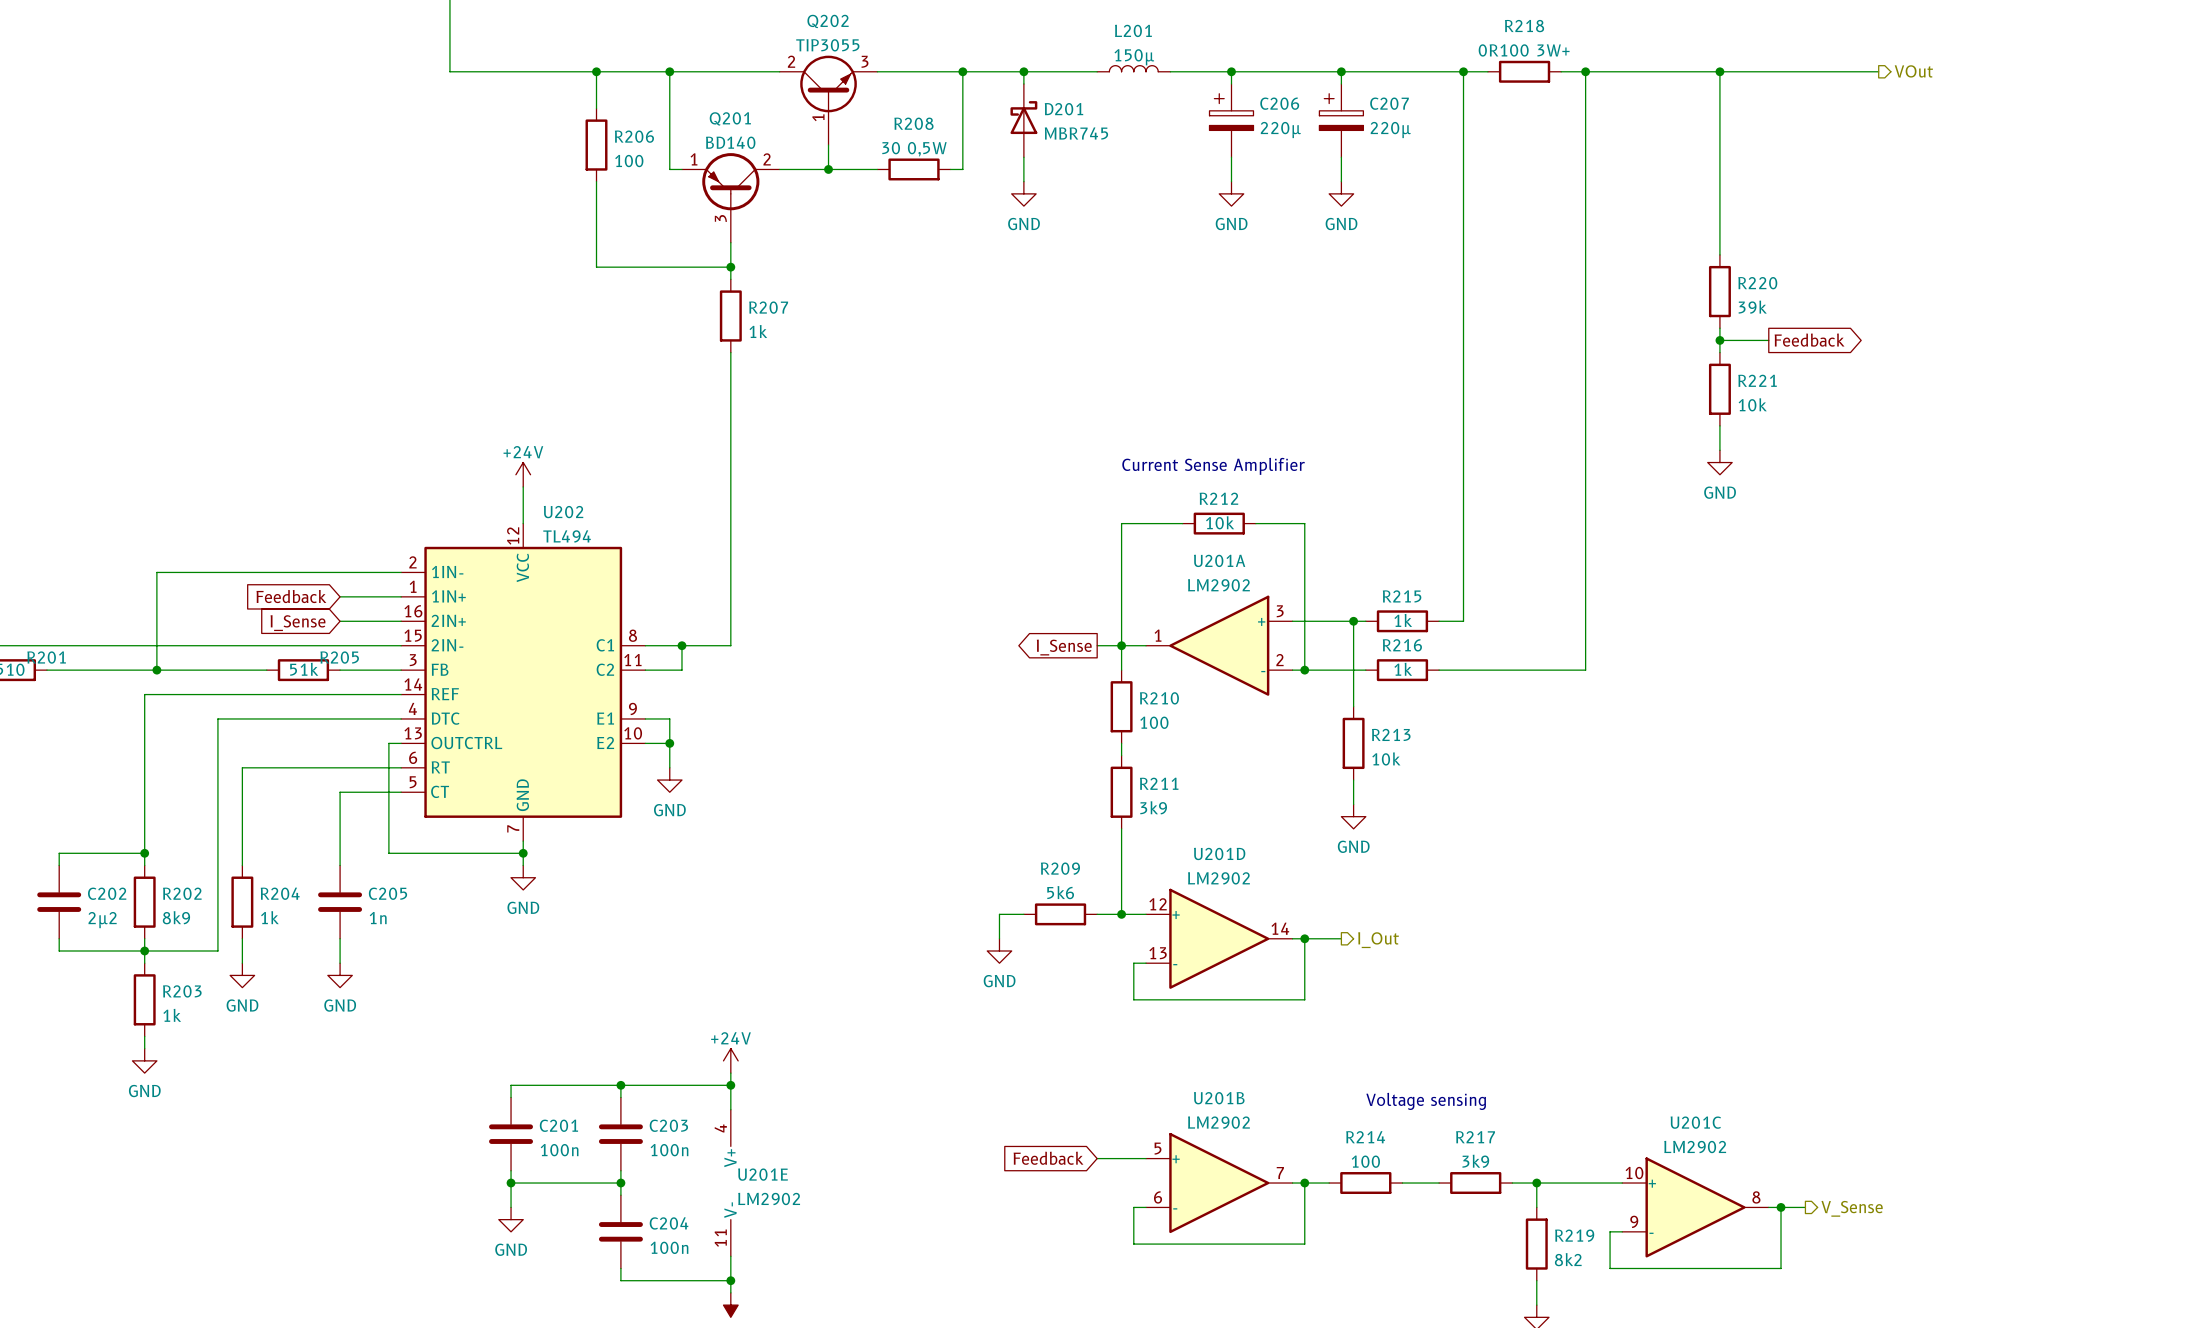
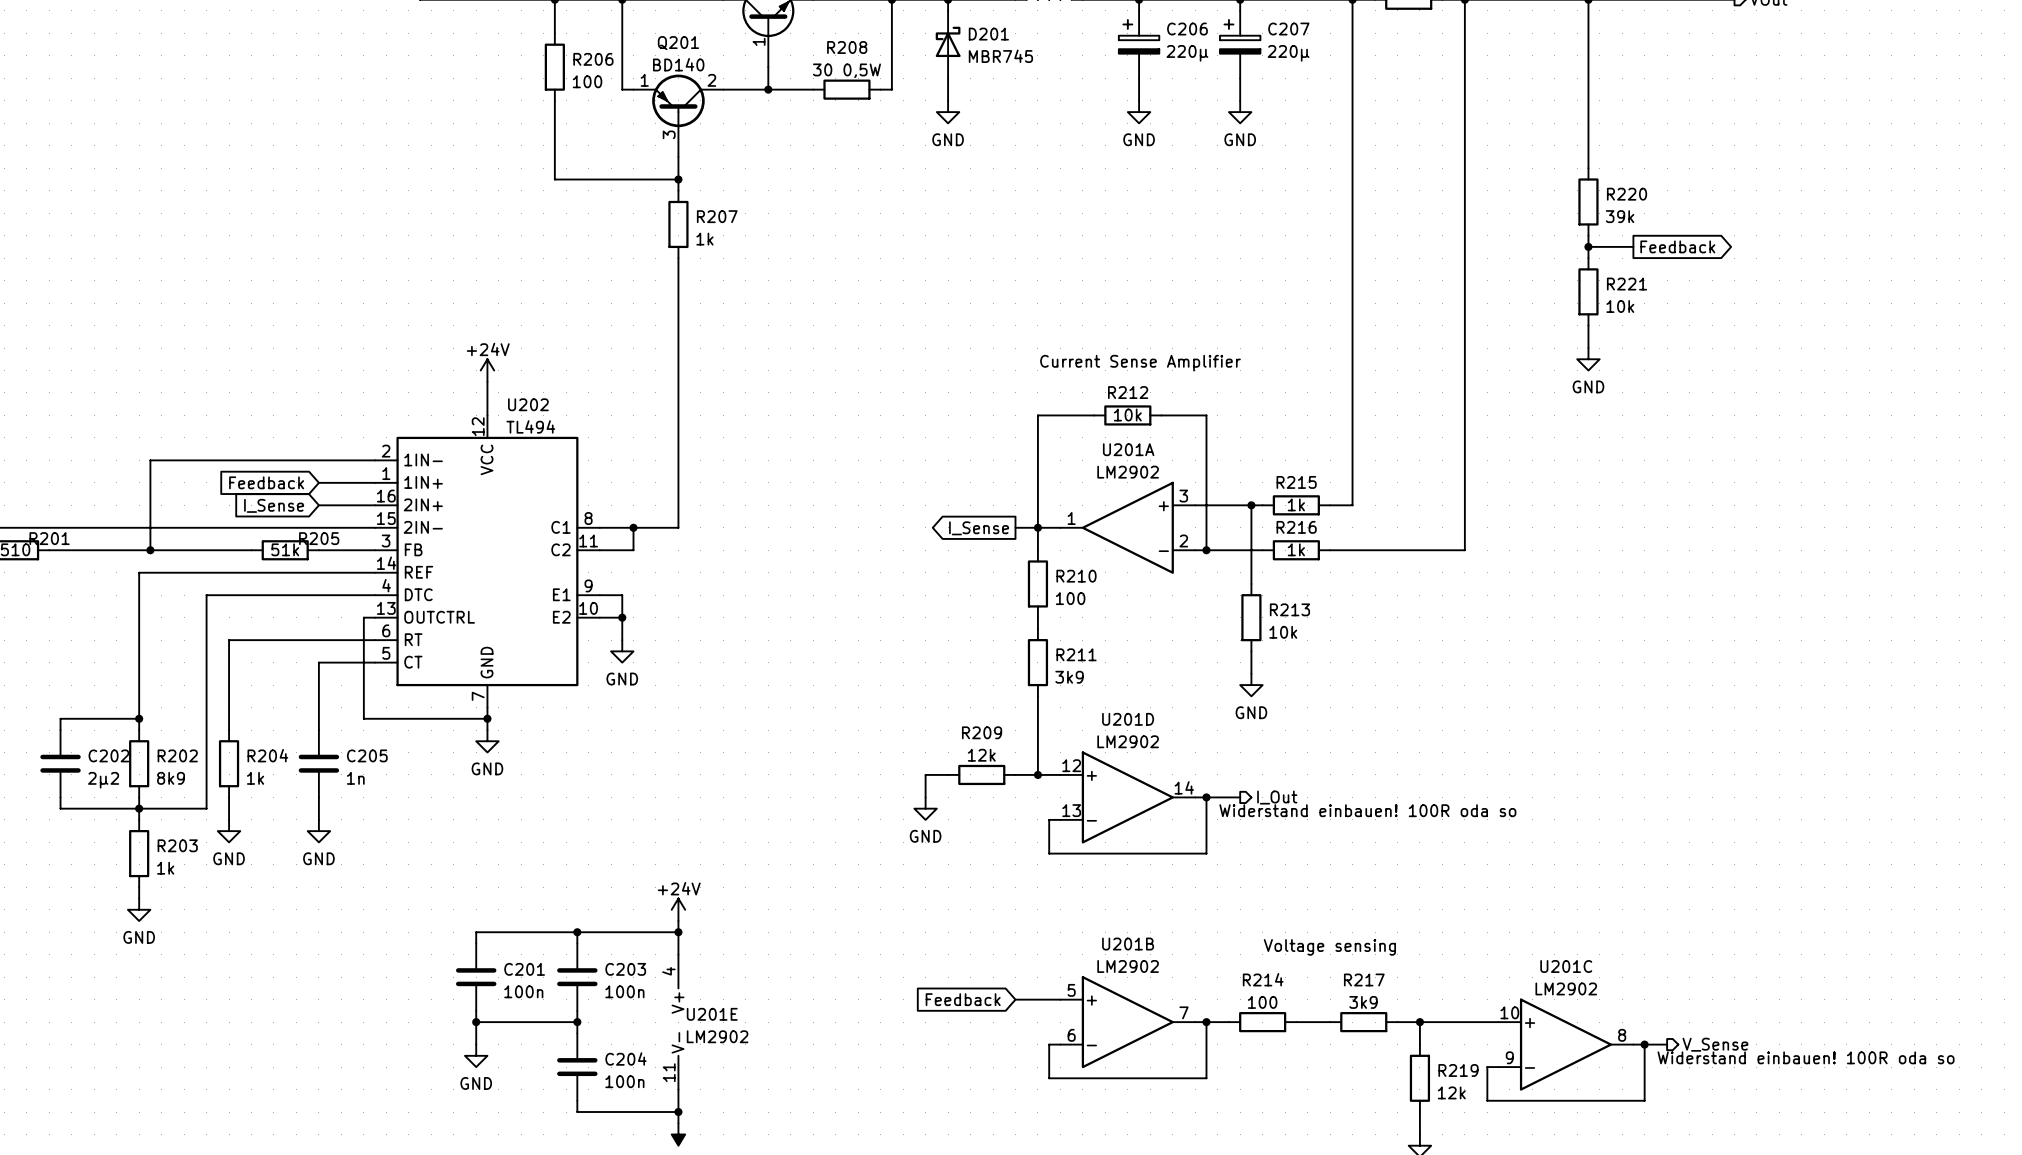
R209 value: 5k6 (1060, 892) -> 12k (981, 755)
text: none -> Widerstand einbauen! 100R oda so (1367, 810)
text: none -> Widerstand einbauen! 100R oda so (1806, 1057)
R219 value: 8k2 (1568, 1259) -> 12k (1451, 1092)

